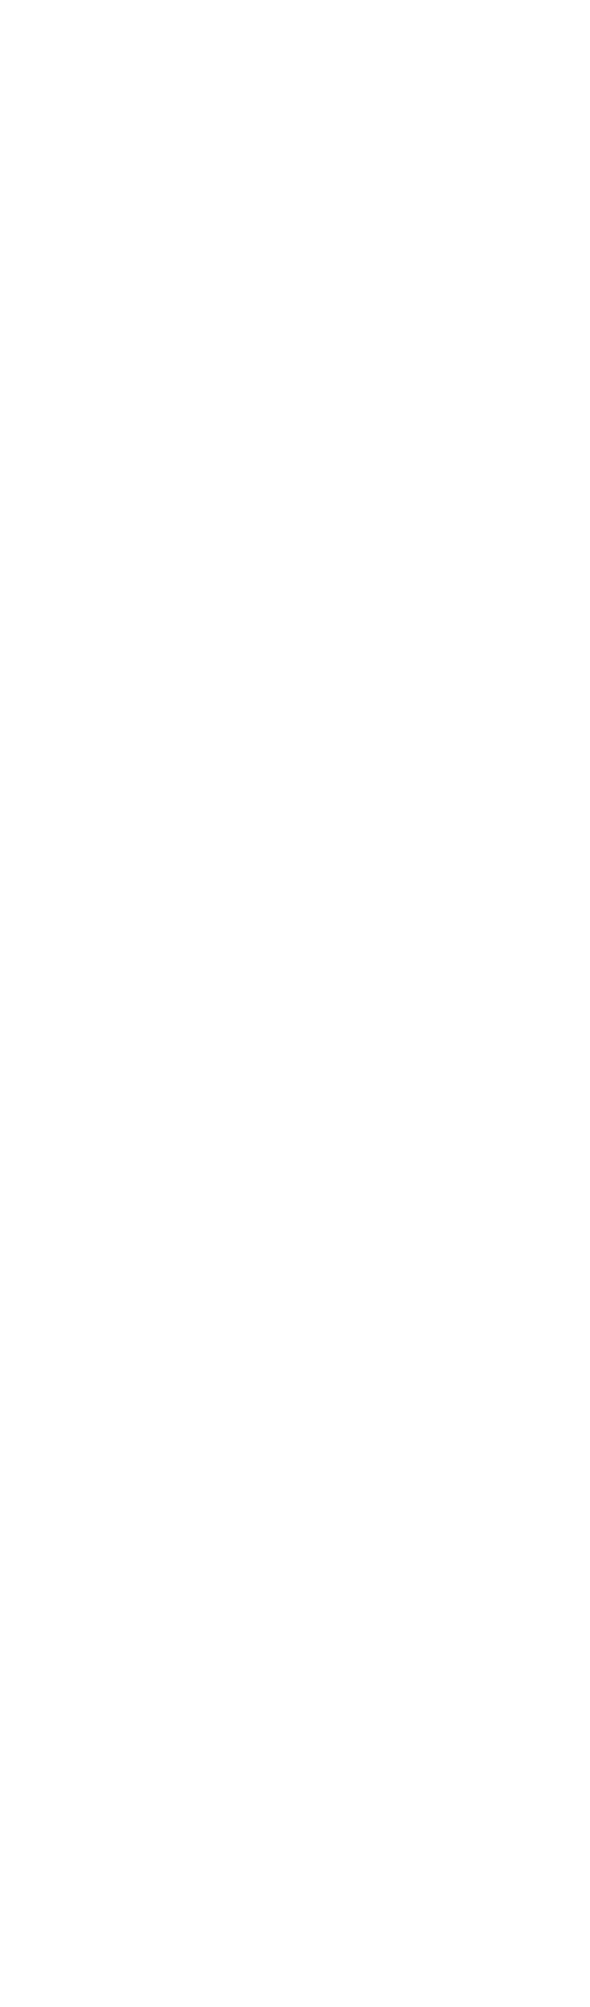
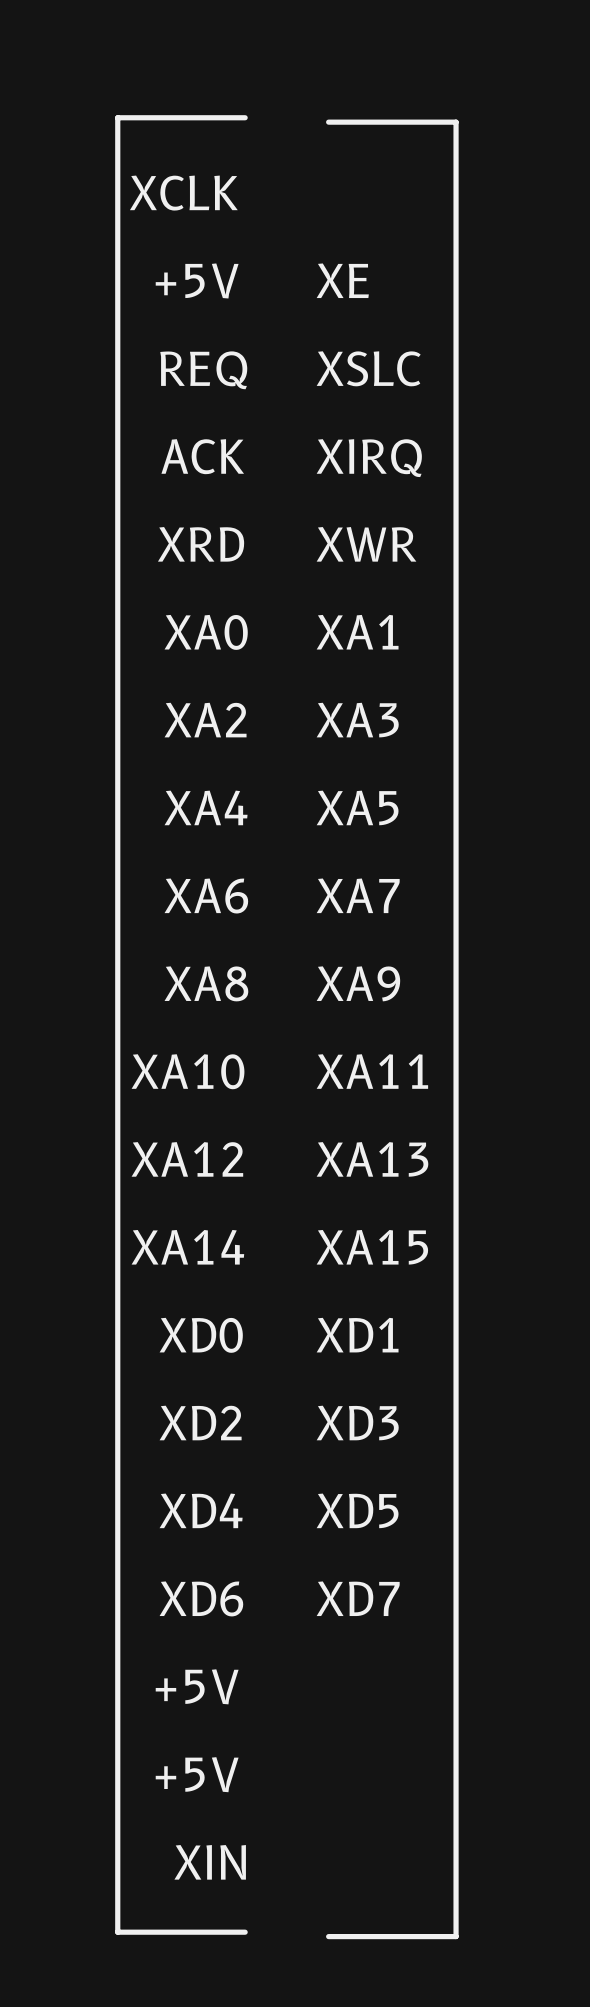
line: none -> (245, 117) (117, 117) (117, 1932) (245, 1932)
line: none -> (328, 122) (456, 122) (456, 1936) (328, 1936)
text: none -> XCLK (183, 193)
text: none -> +5V (197, 280)
text: none -> XE (342, 280)
text: none -> XSLC (368, 368)
text: none -> REQ (203, 370)
text: none -> ACK (202, 456)
text: none -> XIRQ (369, 458)
text: none -> XRD (201, 544)
text: none -> XWR (366, 544)
text: none -> XA0 (206, 632)
text: none -> XA1 (357, 632)
text: none -> XA2 (205, 720)
text: none -> XA3 (357, 720)
text: none -> XA4 (206, 807)
text: none -> XA5 (357, 807)
text: none -> XA6 (206, 896)
text: none -> XA7 (358, 895)
text: none -> XA8 (206, 983)
text: none -> XA9 (358, 983)
text: none -> XA10 (188, 1071)
text: none -> XA11 (372, 1071)
text: none -> XA12 (187, 1159)
text: none -> XA13 (372, 1159)
text: none -> XA14 (187, 1247)
text: none -> XA15 (372, 1247)
text: none -> XD0 (201, 1335)
text: none -> XD1 (357, 1335)
text: none -> XD2 (200, 1423)
text: none -> XD3 (357, 1423)
text: none -> XD4 (201, 1510)
text: none -> XD5 (357, 1510)
text: none -> XD6 (201, 1598)
text: none -> XD7 (358, 1598)
text: none -> +5V (197, 1686)
text: none -> +5V (197, 1774)
text: none -> XIN (210, 1862)

